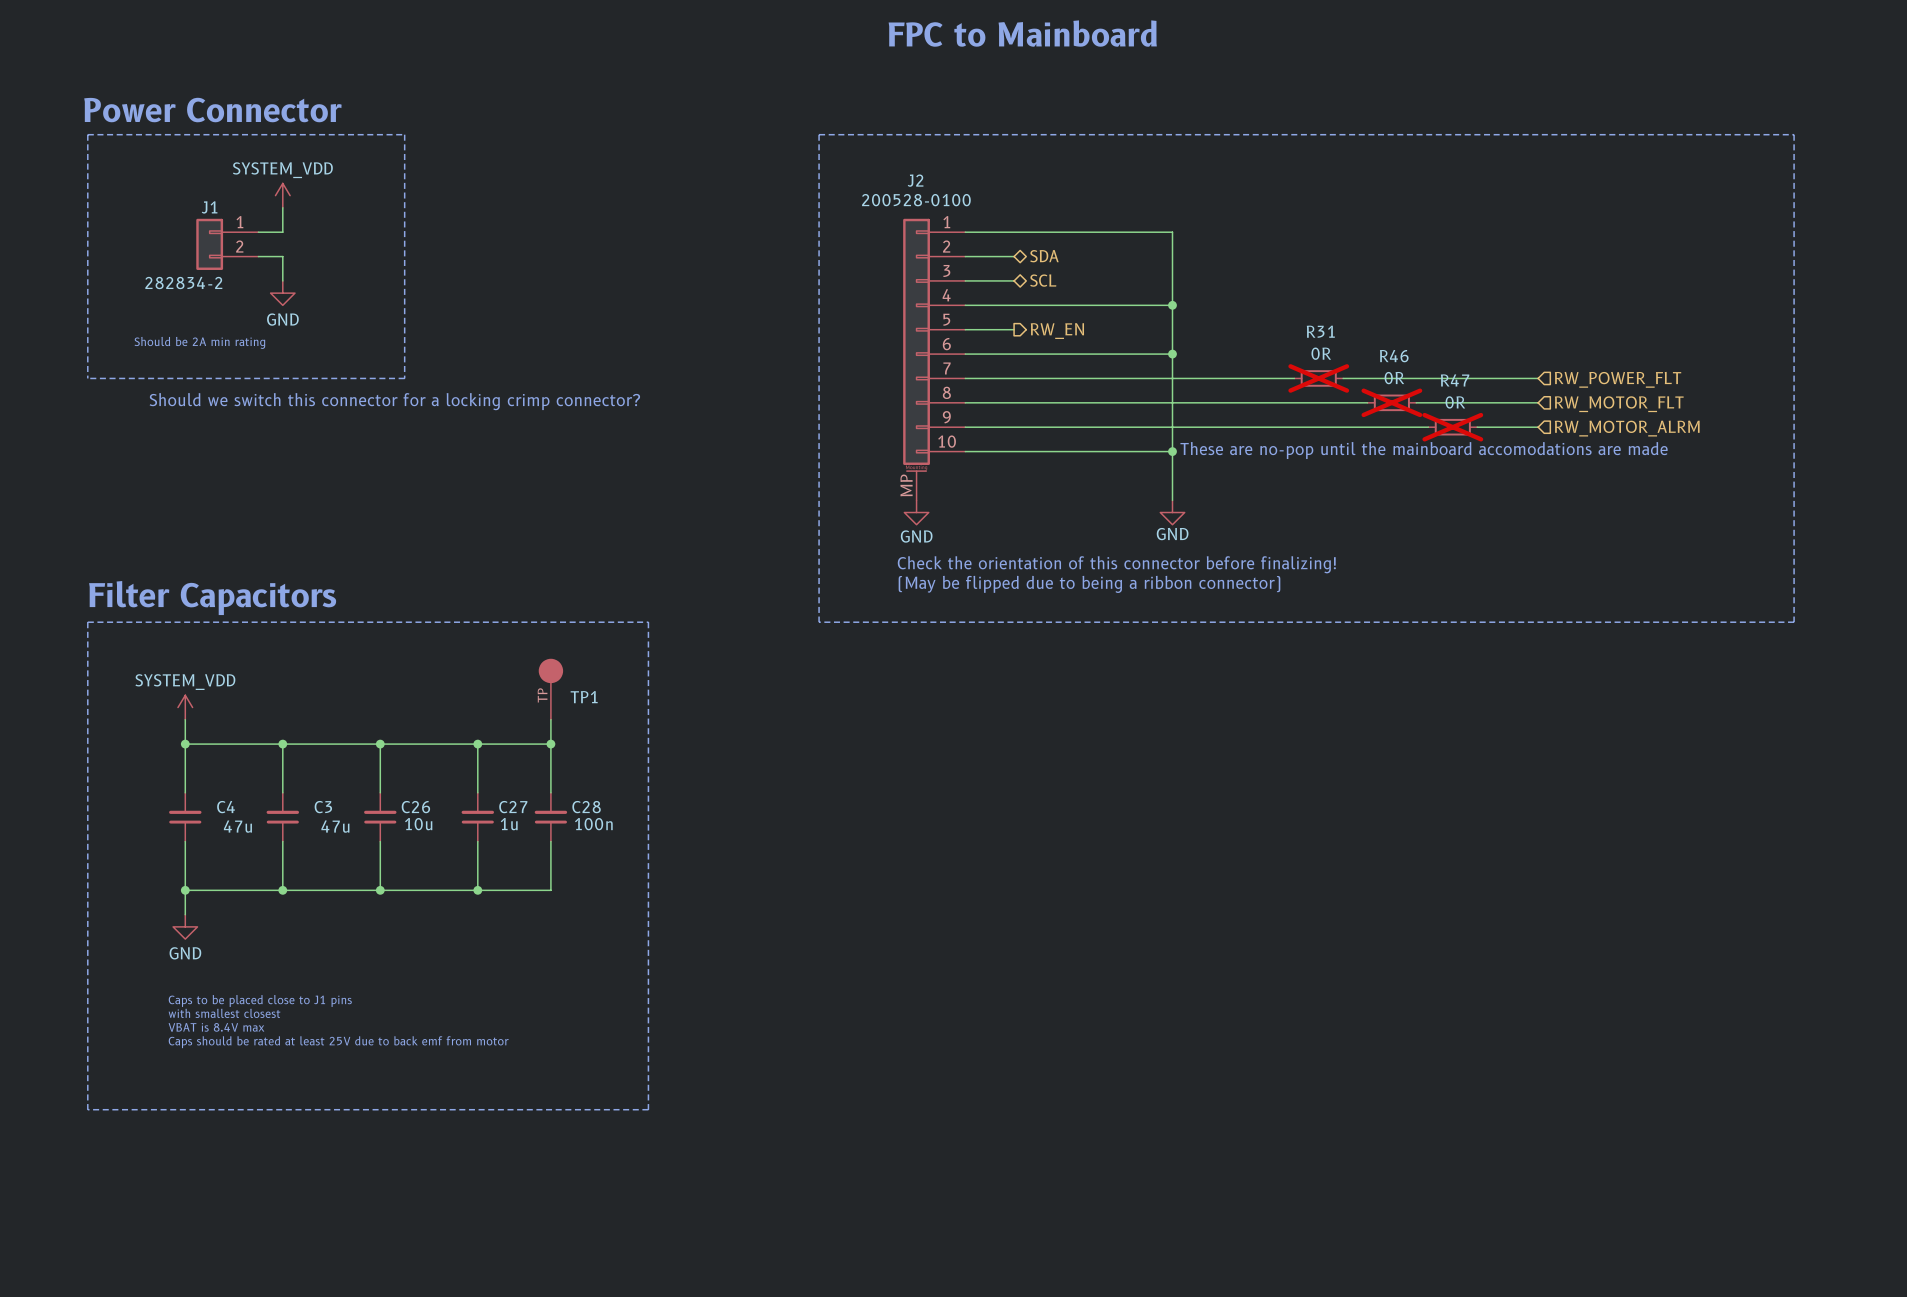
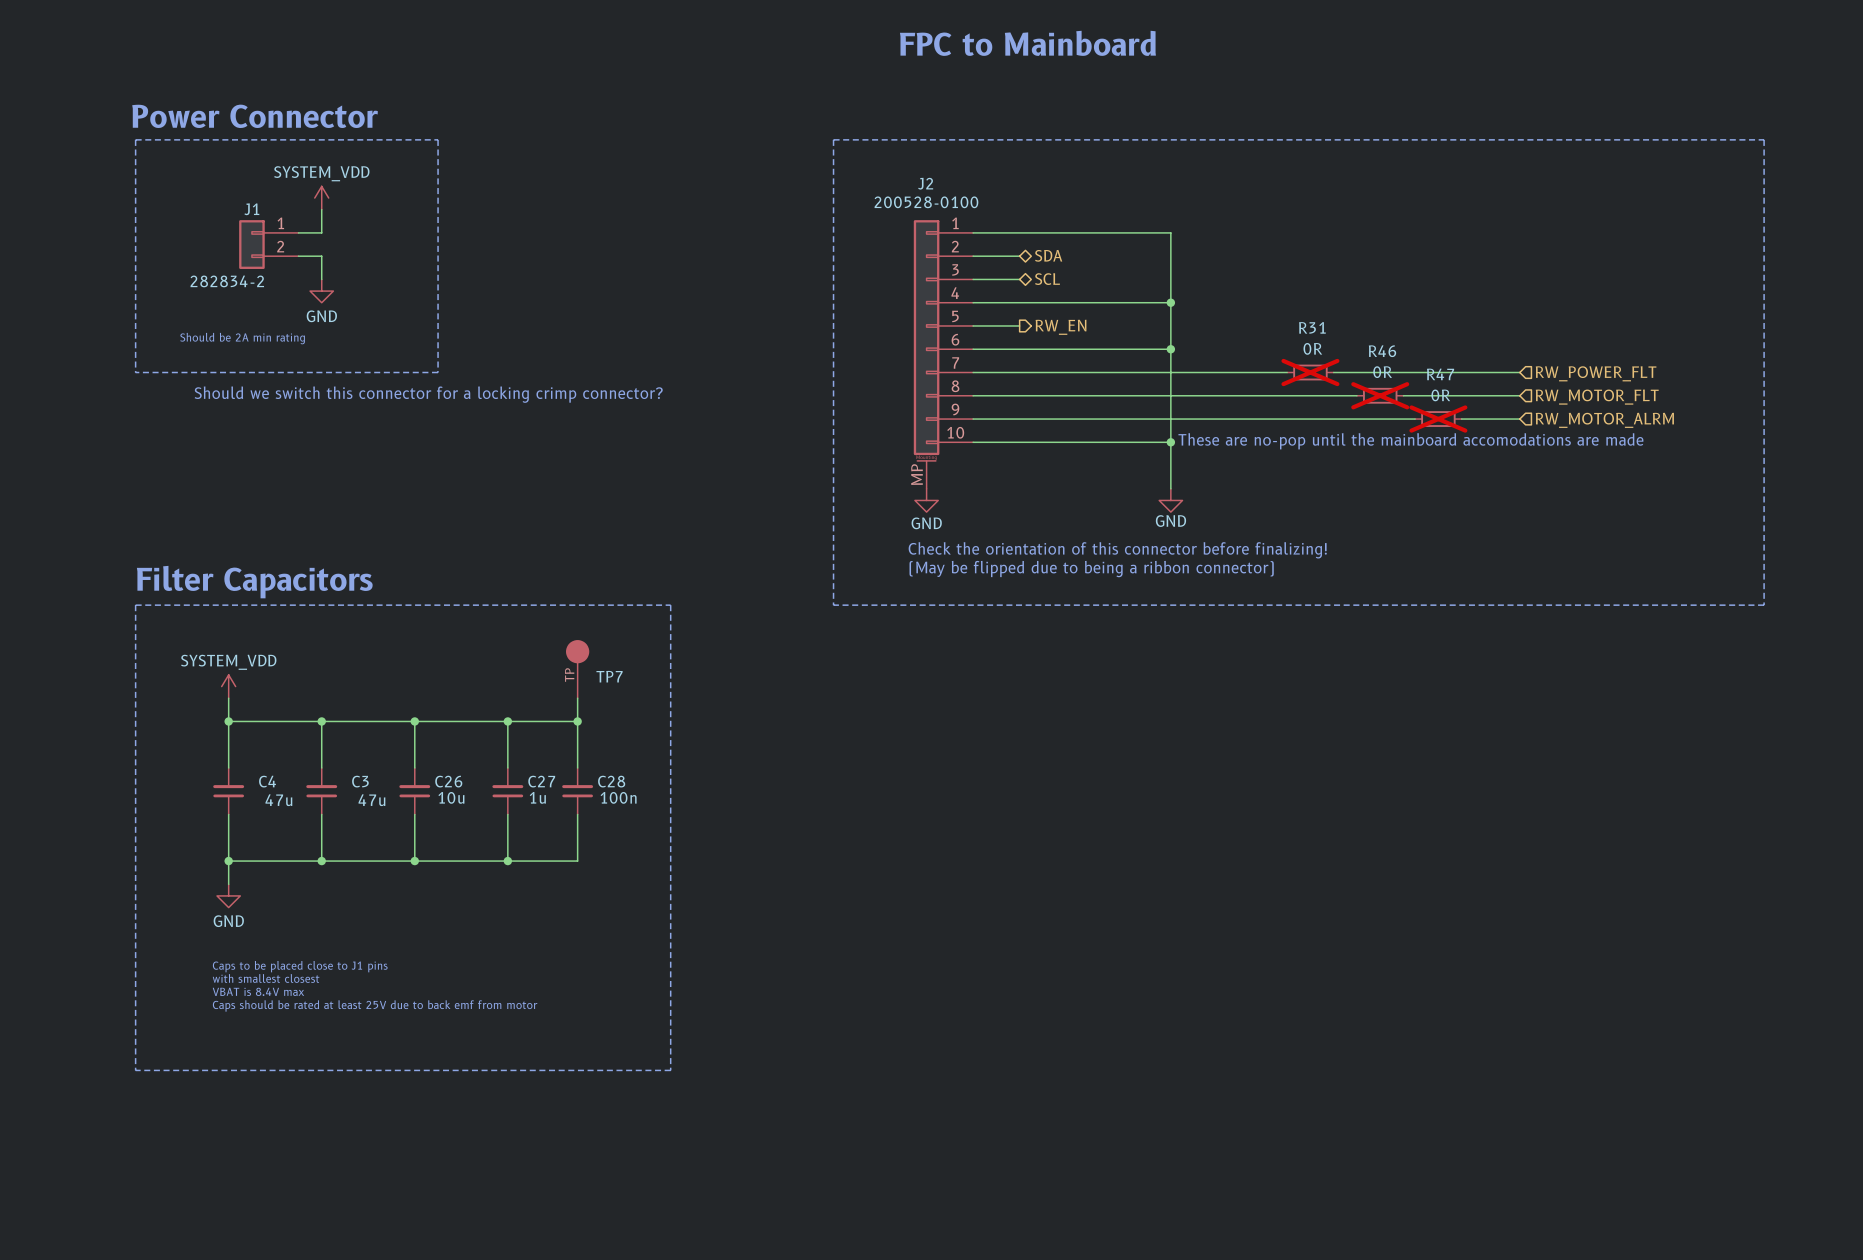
TP1 name: TP1 (584, 697) -> TP7 (609, 676)

